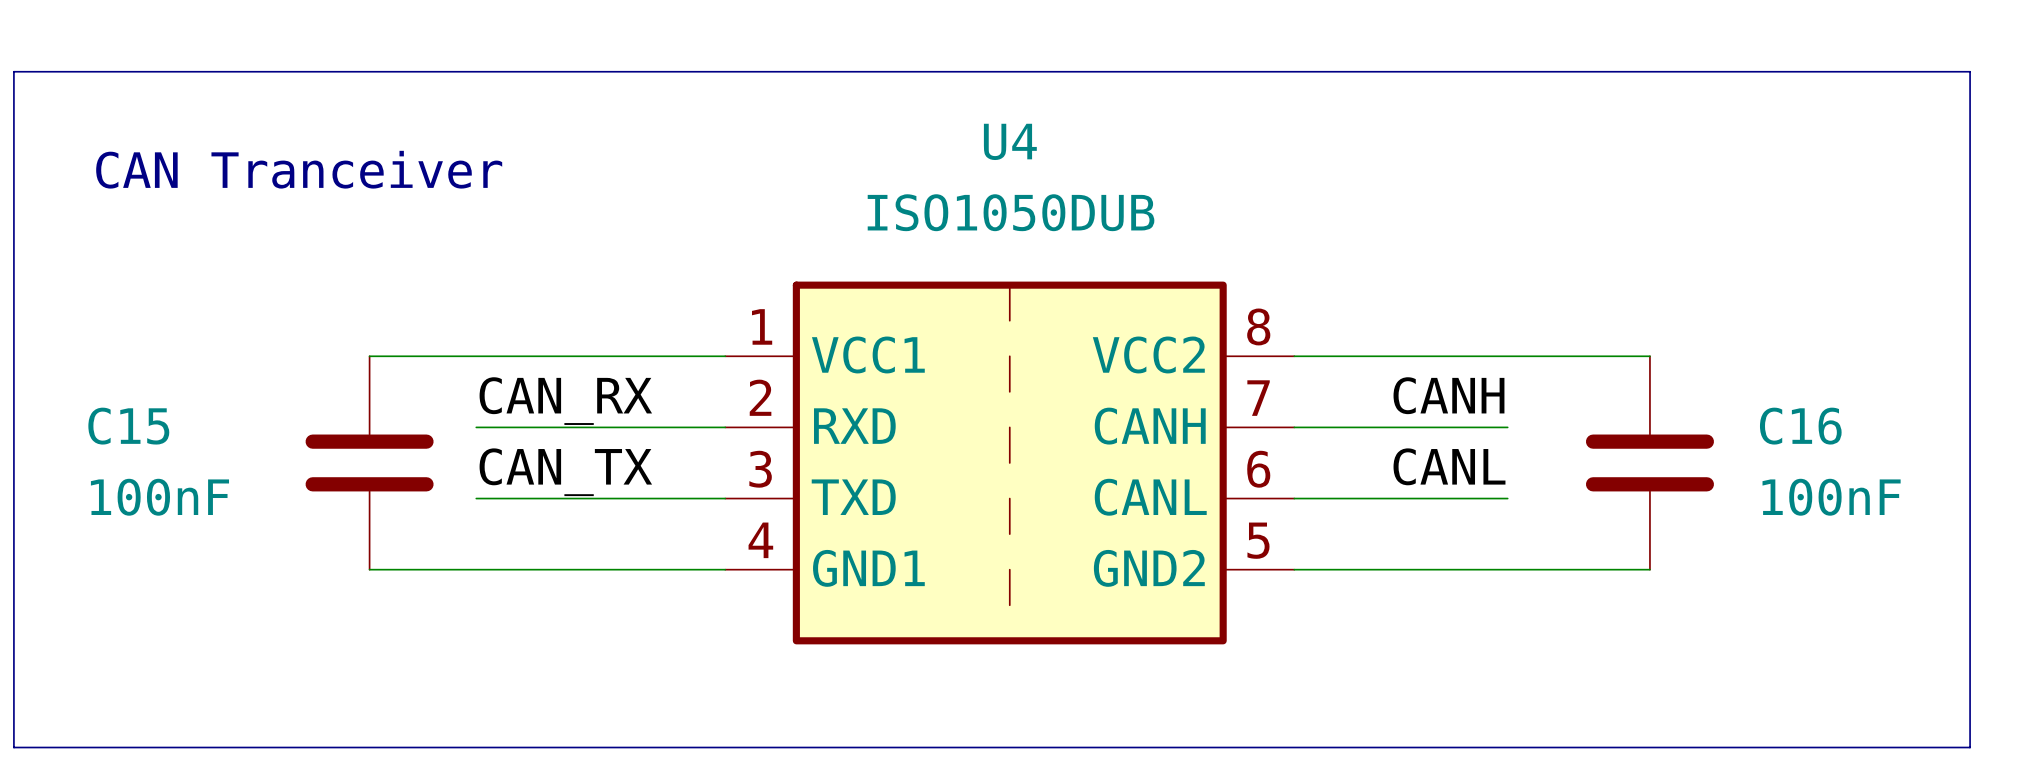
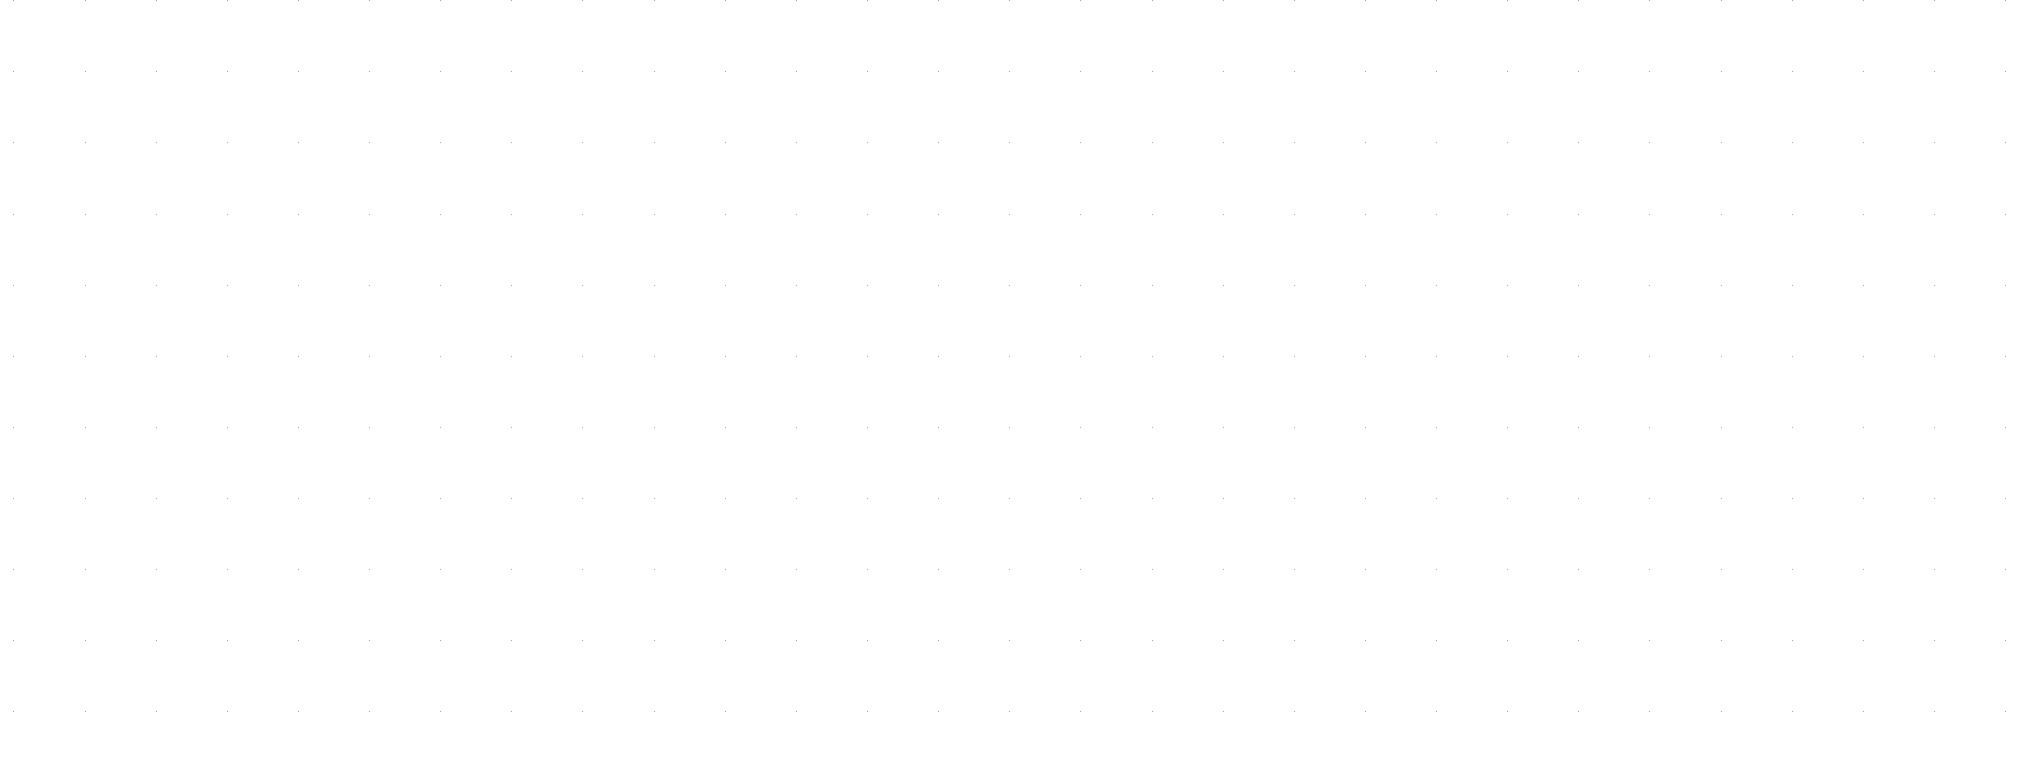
line: (13, 71) (1970, 71) (1970, 747) (13, 747) (13, 71) -> none
text: CAN Tranceiver (299, 169) -> none
wire: (369, 356) (725, 356) -> none
wire: (1294, 356) (1649, 356) -> none
label: CANH (1448, 395) -> none
label: CAN_RX (565, 401) -> none
wire: (476, 427) (725, 427) -> none
wire: (1294, 427) (1507, 427) -> none
C15: 100nF (369, 462) -> none
U4: ISO1050DUB (1009, 462) -> none
C16: 100nF (1649, 462) -> none
label: CANL (1449, 466) -> none
label: CAN_TX (565, 472) -> none
wire: (476, 498) (725, 498) -> none
wire: (1294, 498) (1507, 498) -> none
wire: (369, 569) (725, 569) -> none
wire: (1294, 569) (1649, 569) -> none

